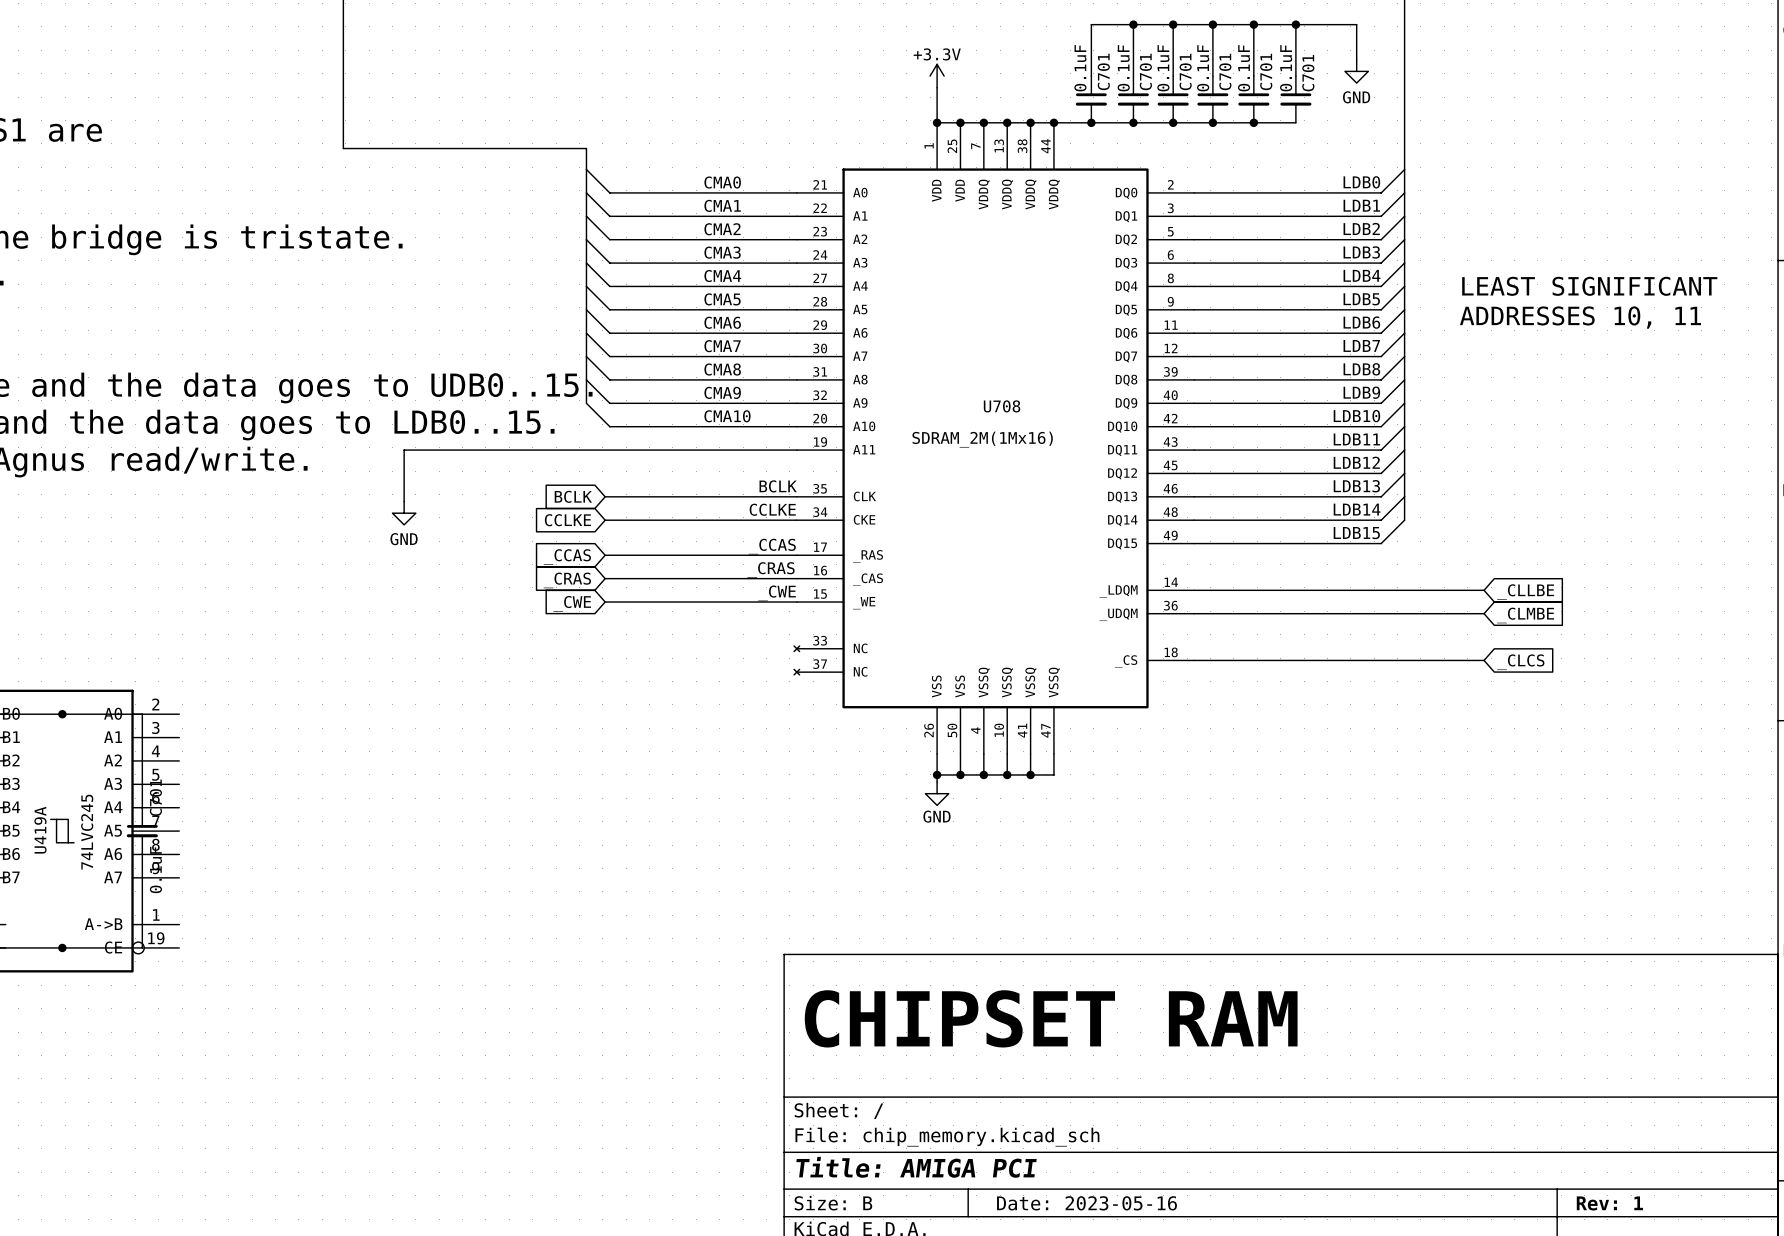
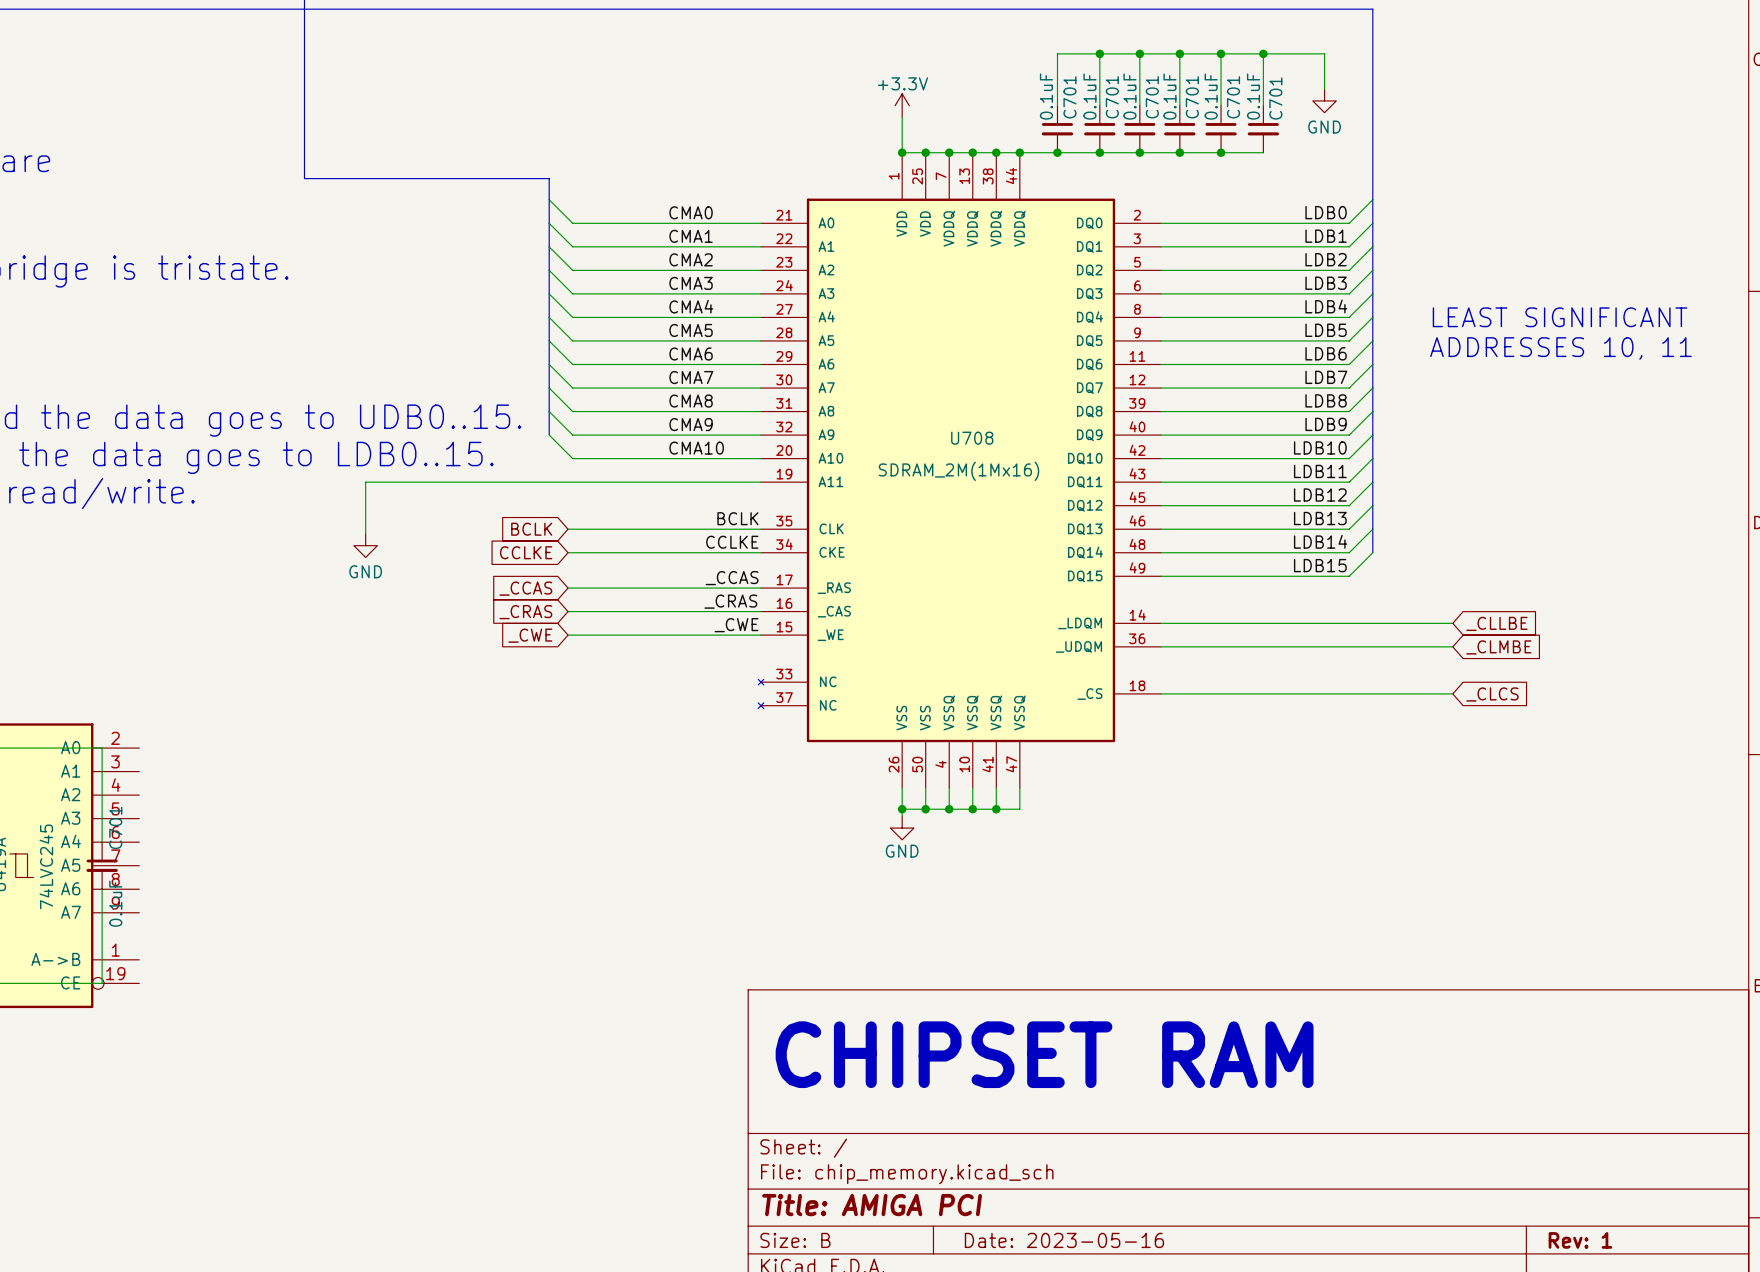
junction: (62, 714) -> none
junction: (62, 947) -> none

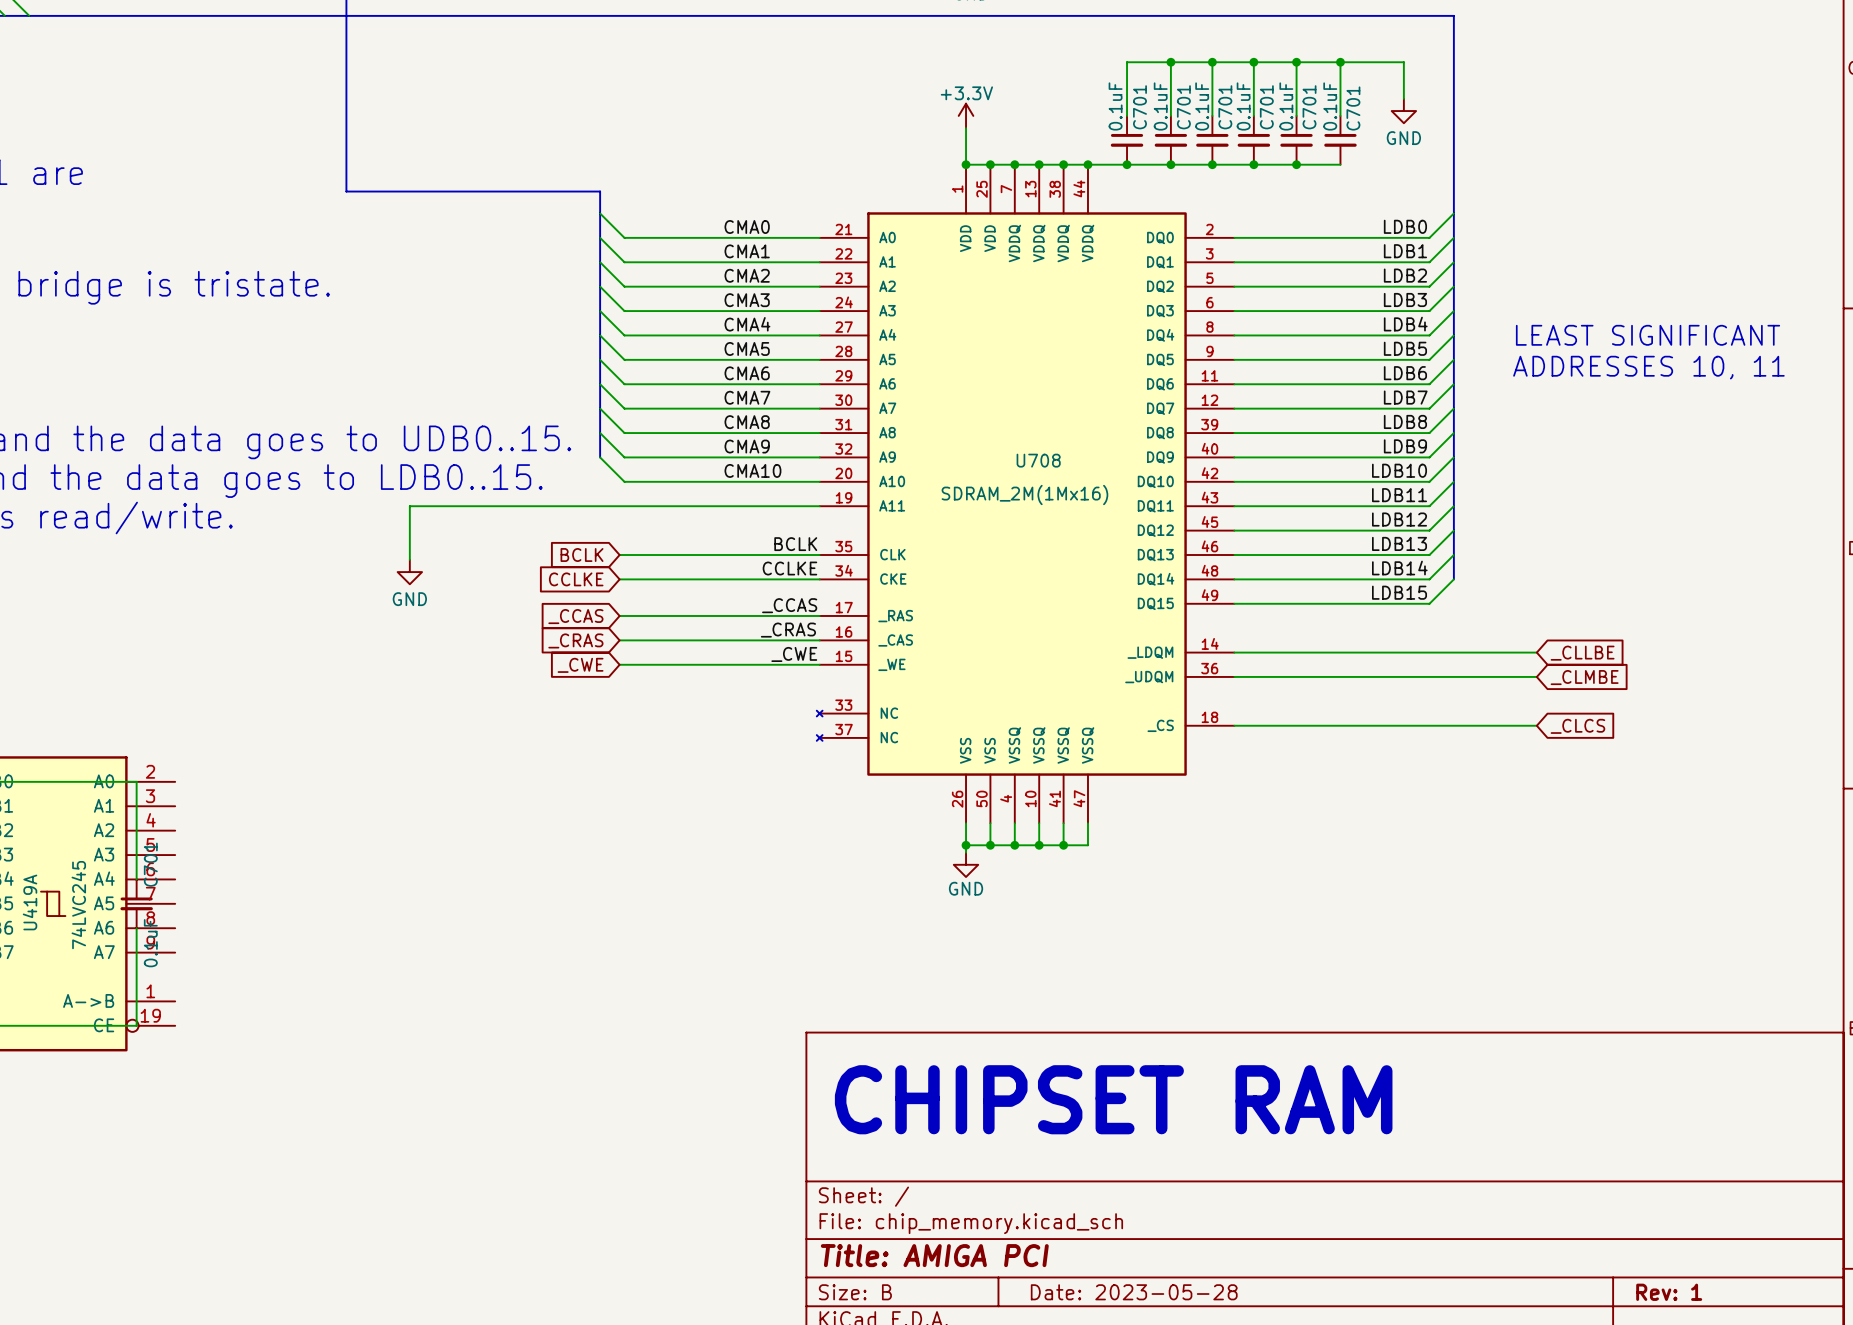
title block: Date: 2023-05-16 (1064, 1240) -> Date: 2023-05-28 (1134, 1292)

